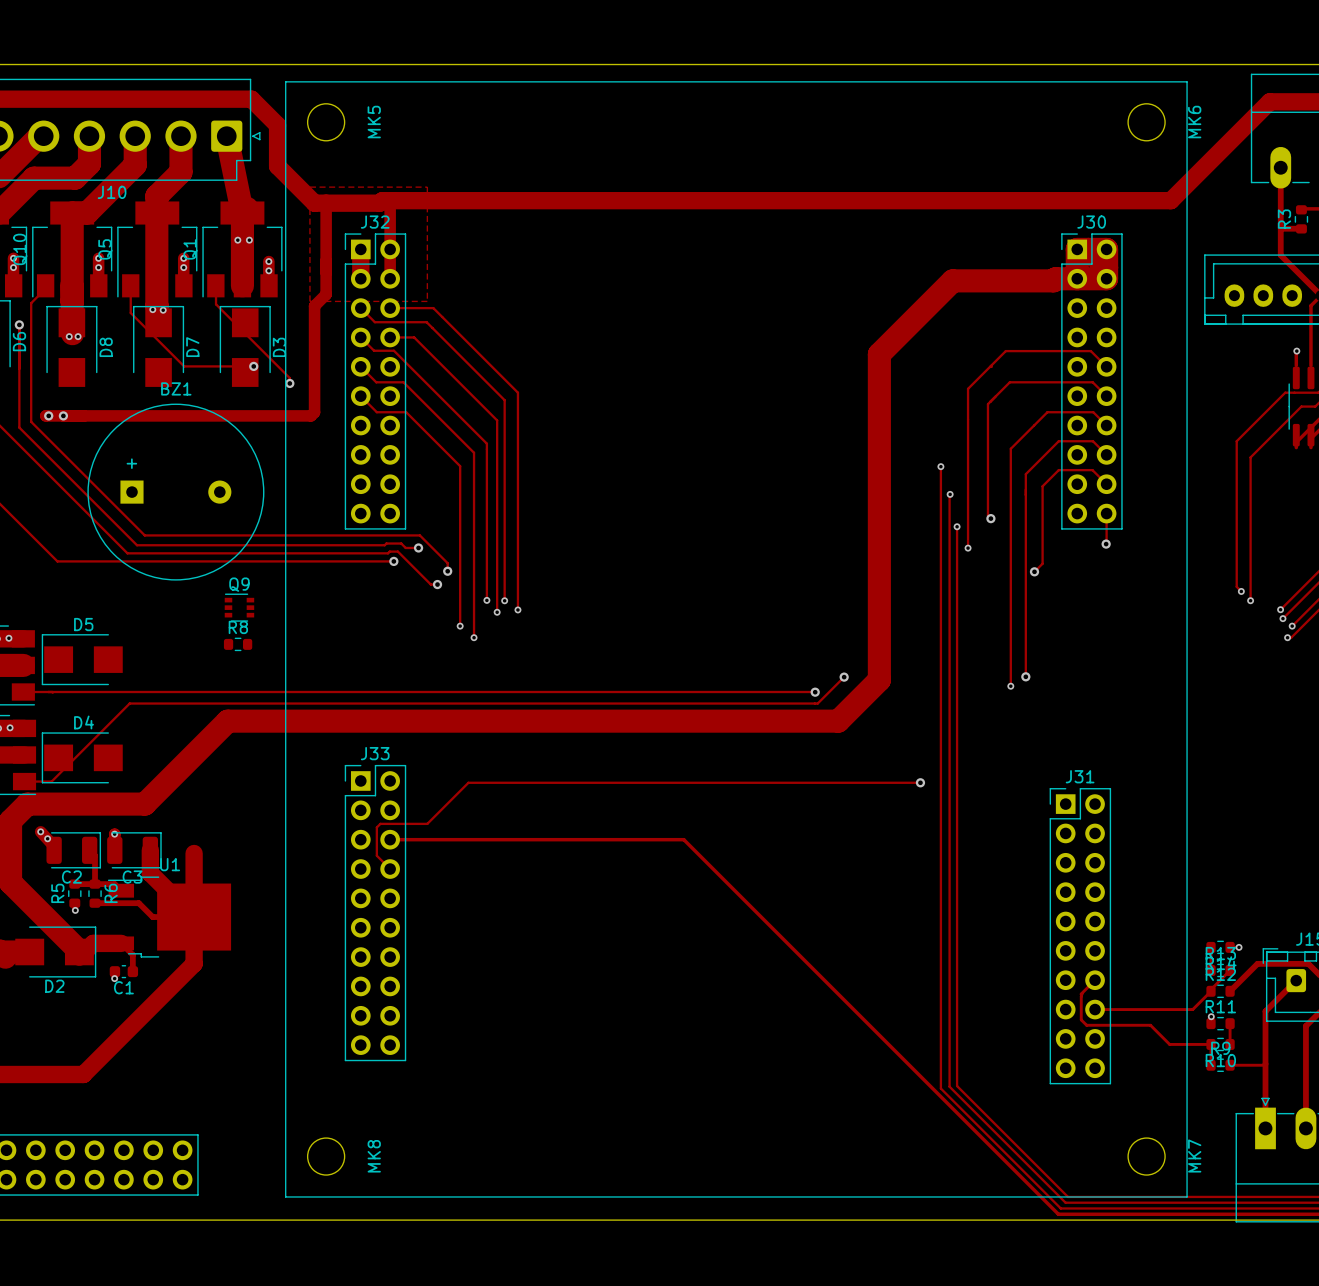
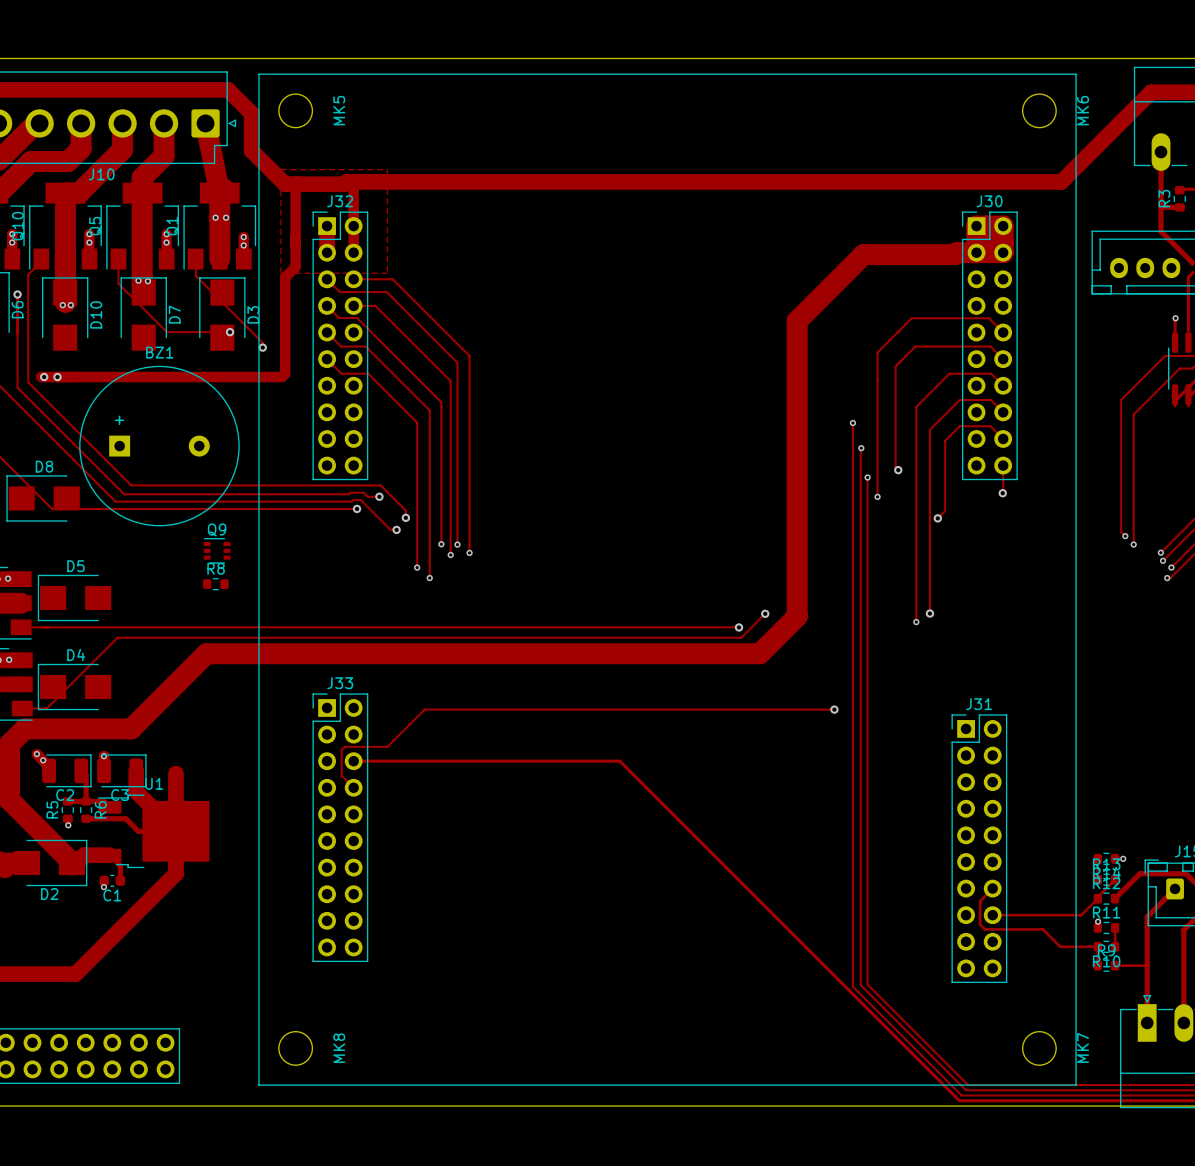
D8 name: D8 (106, 347) -> D10 (96, 314)
D8: none -> (43, 498)

